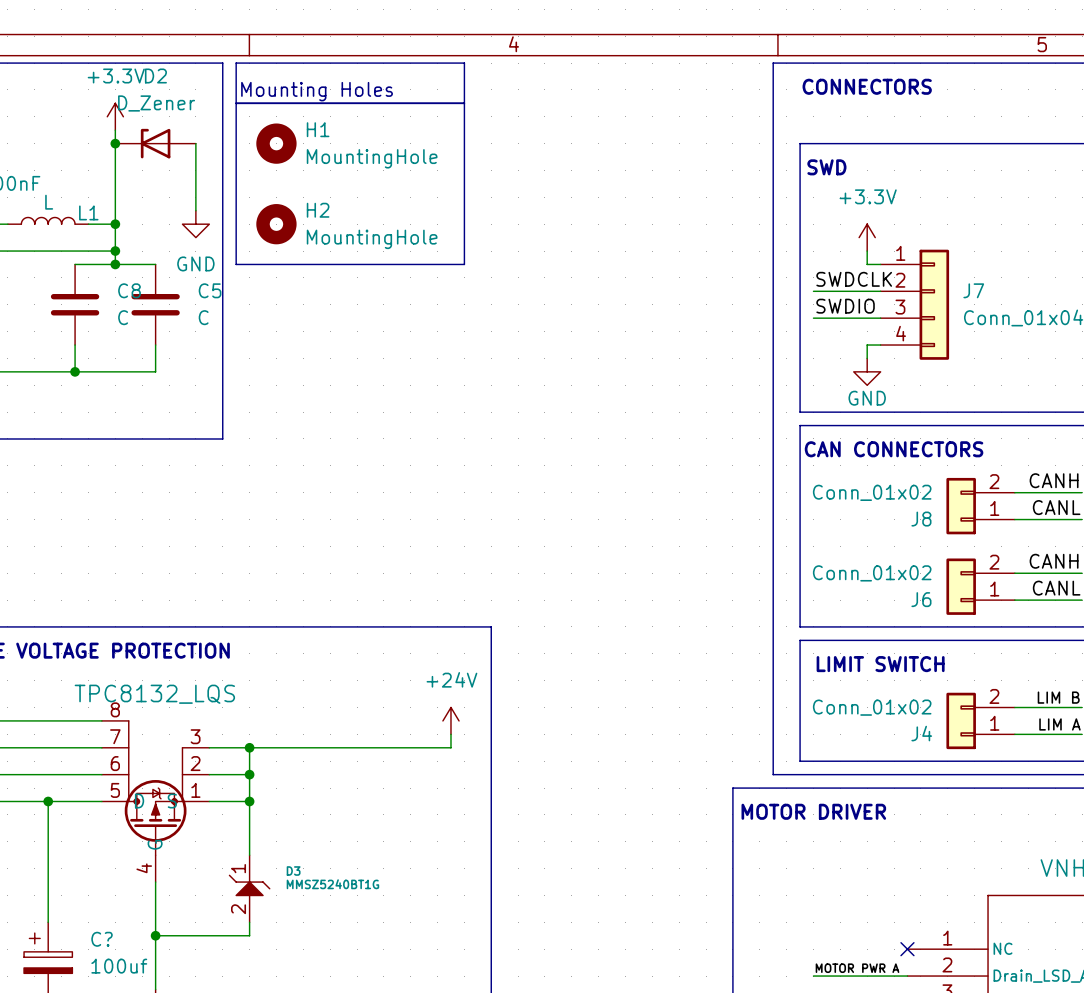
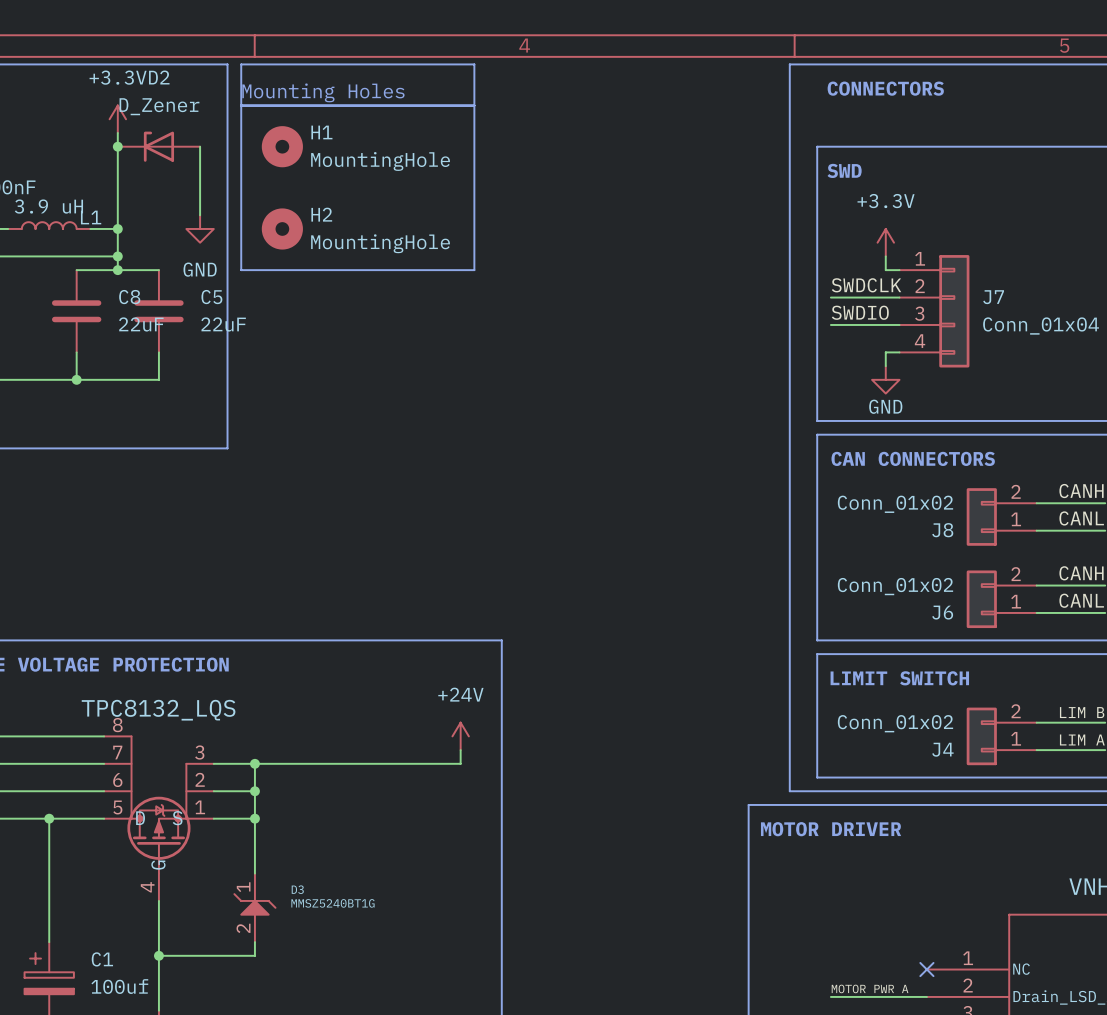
L1 value: L (49, 202) -> 3.9 uH (48, 206)
C8 value: C (123, 317) -> 22uF (141, 324)
C5 value: C (203, 317) -> 22uF (223, 324)
C? name: C? (102, 939) -> C1 (102, 959)

